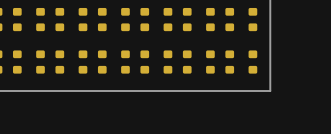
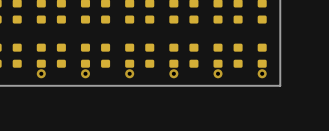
via: none -> (41, 73)
via: none -> (85, 73)
via: none -> (129, 73)
via: none -> (173, 73)
via: none -> (218, 73)
via: none -> (262, 73)

